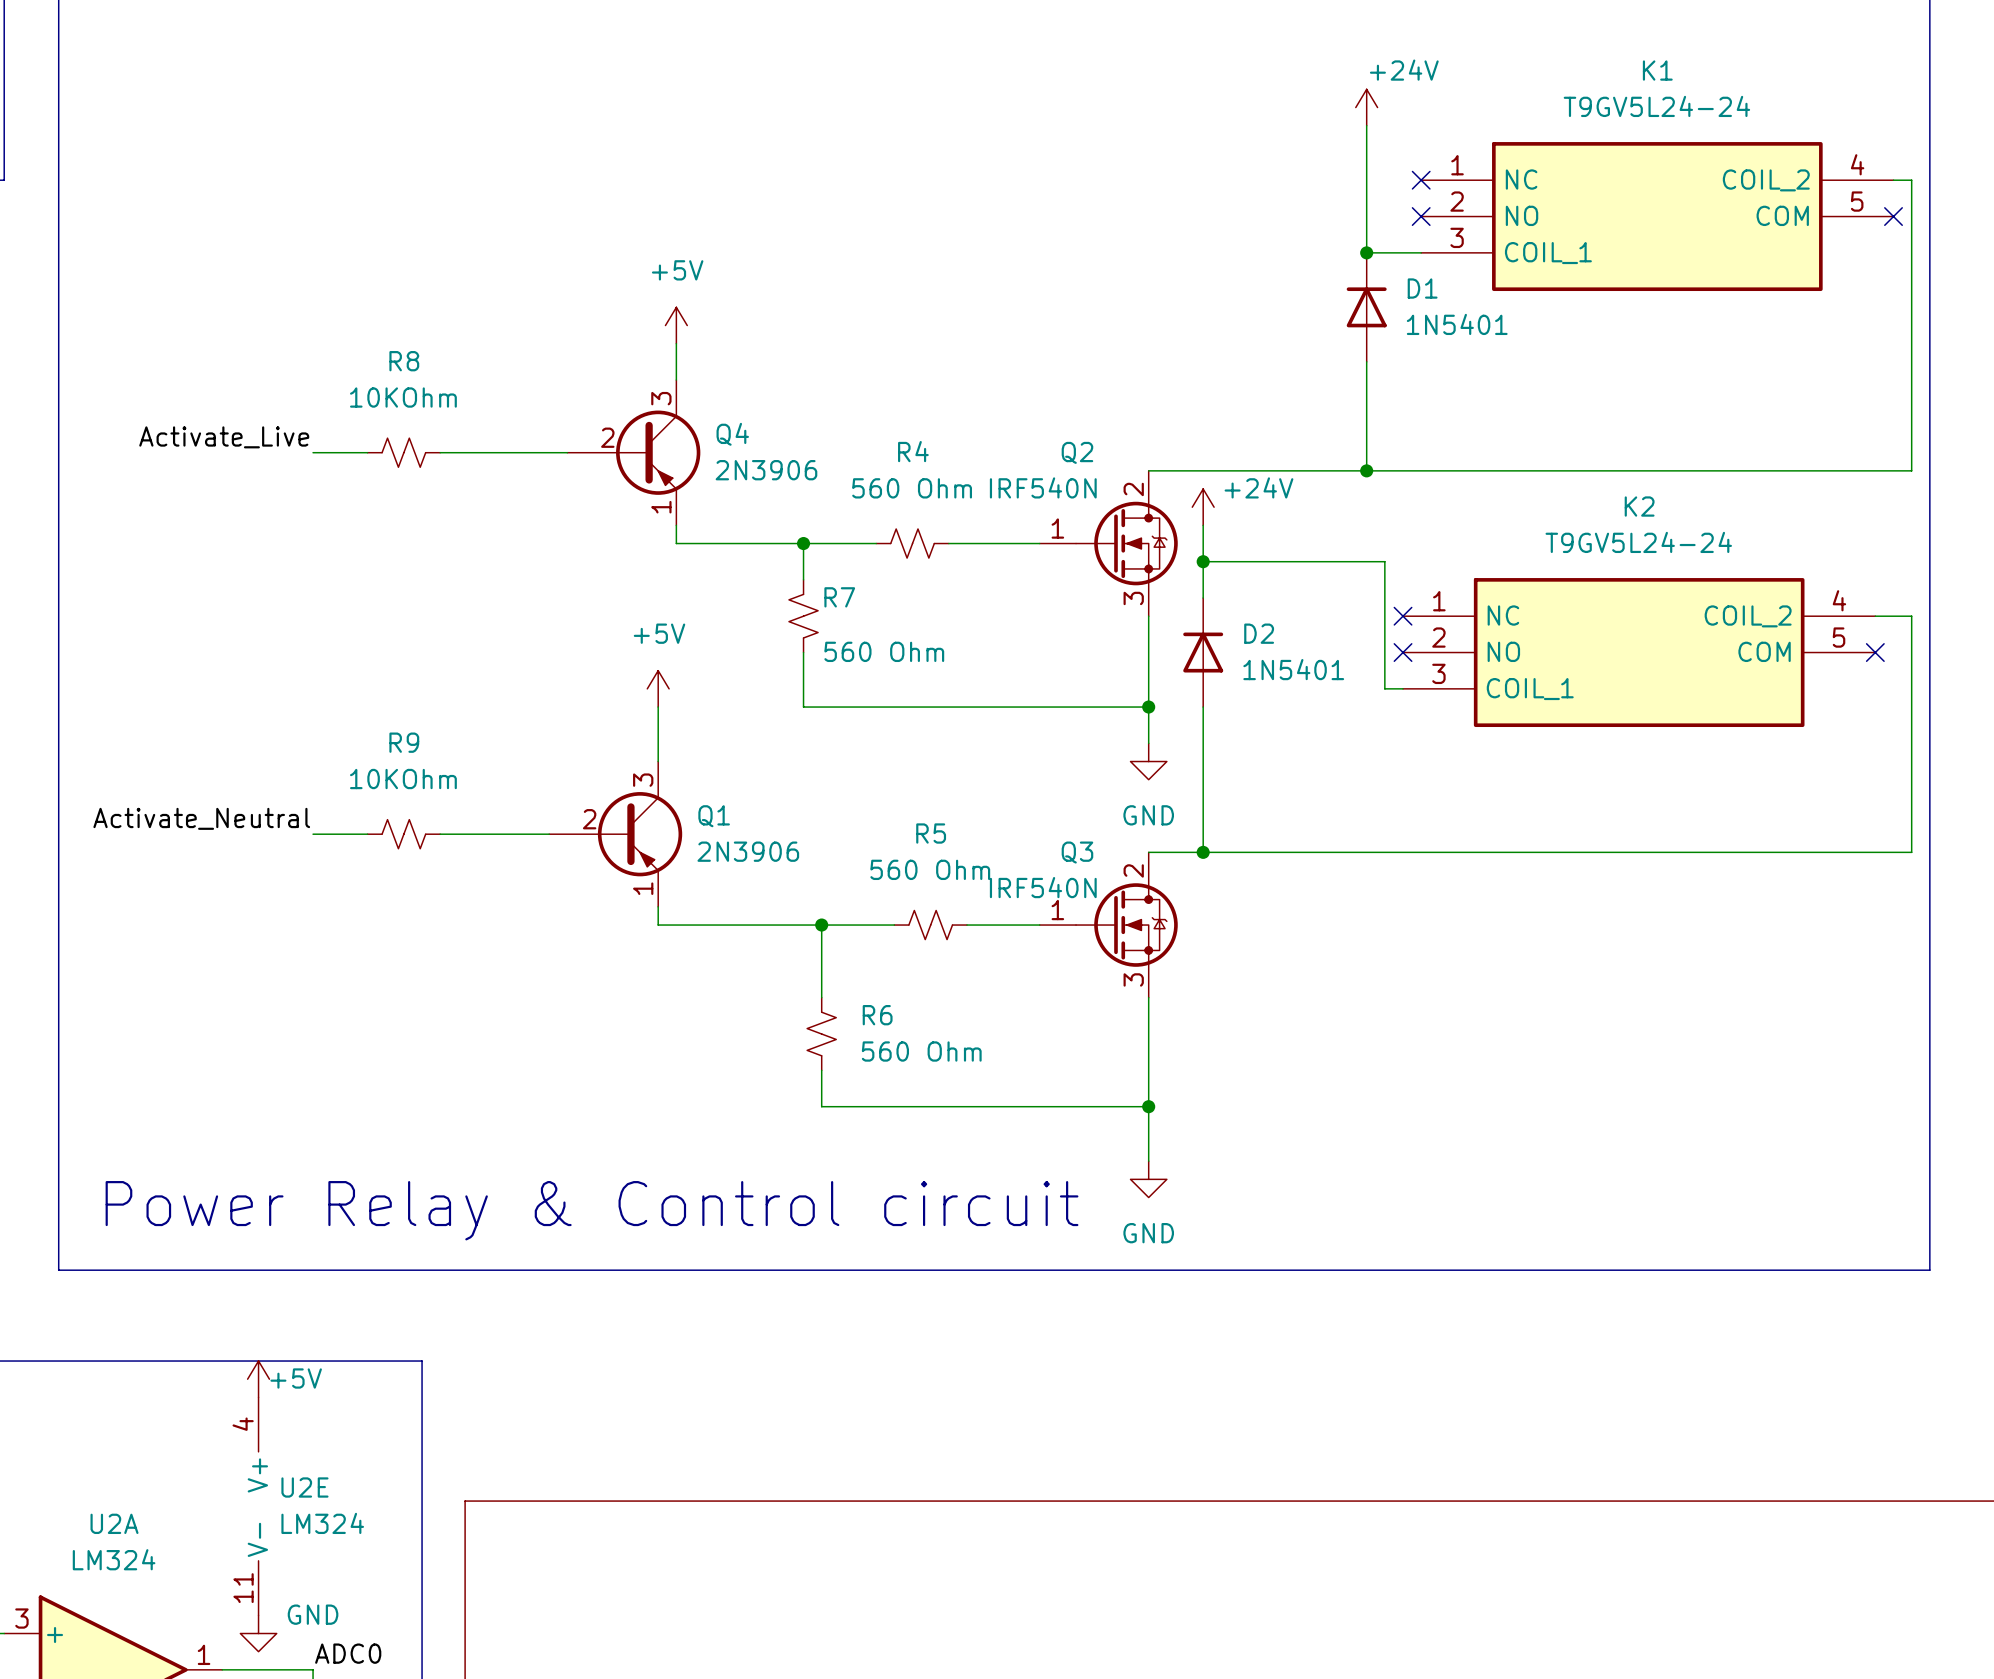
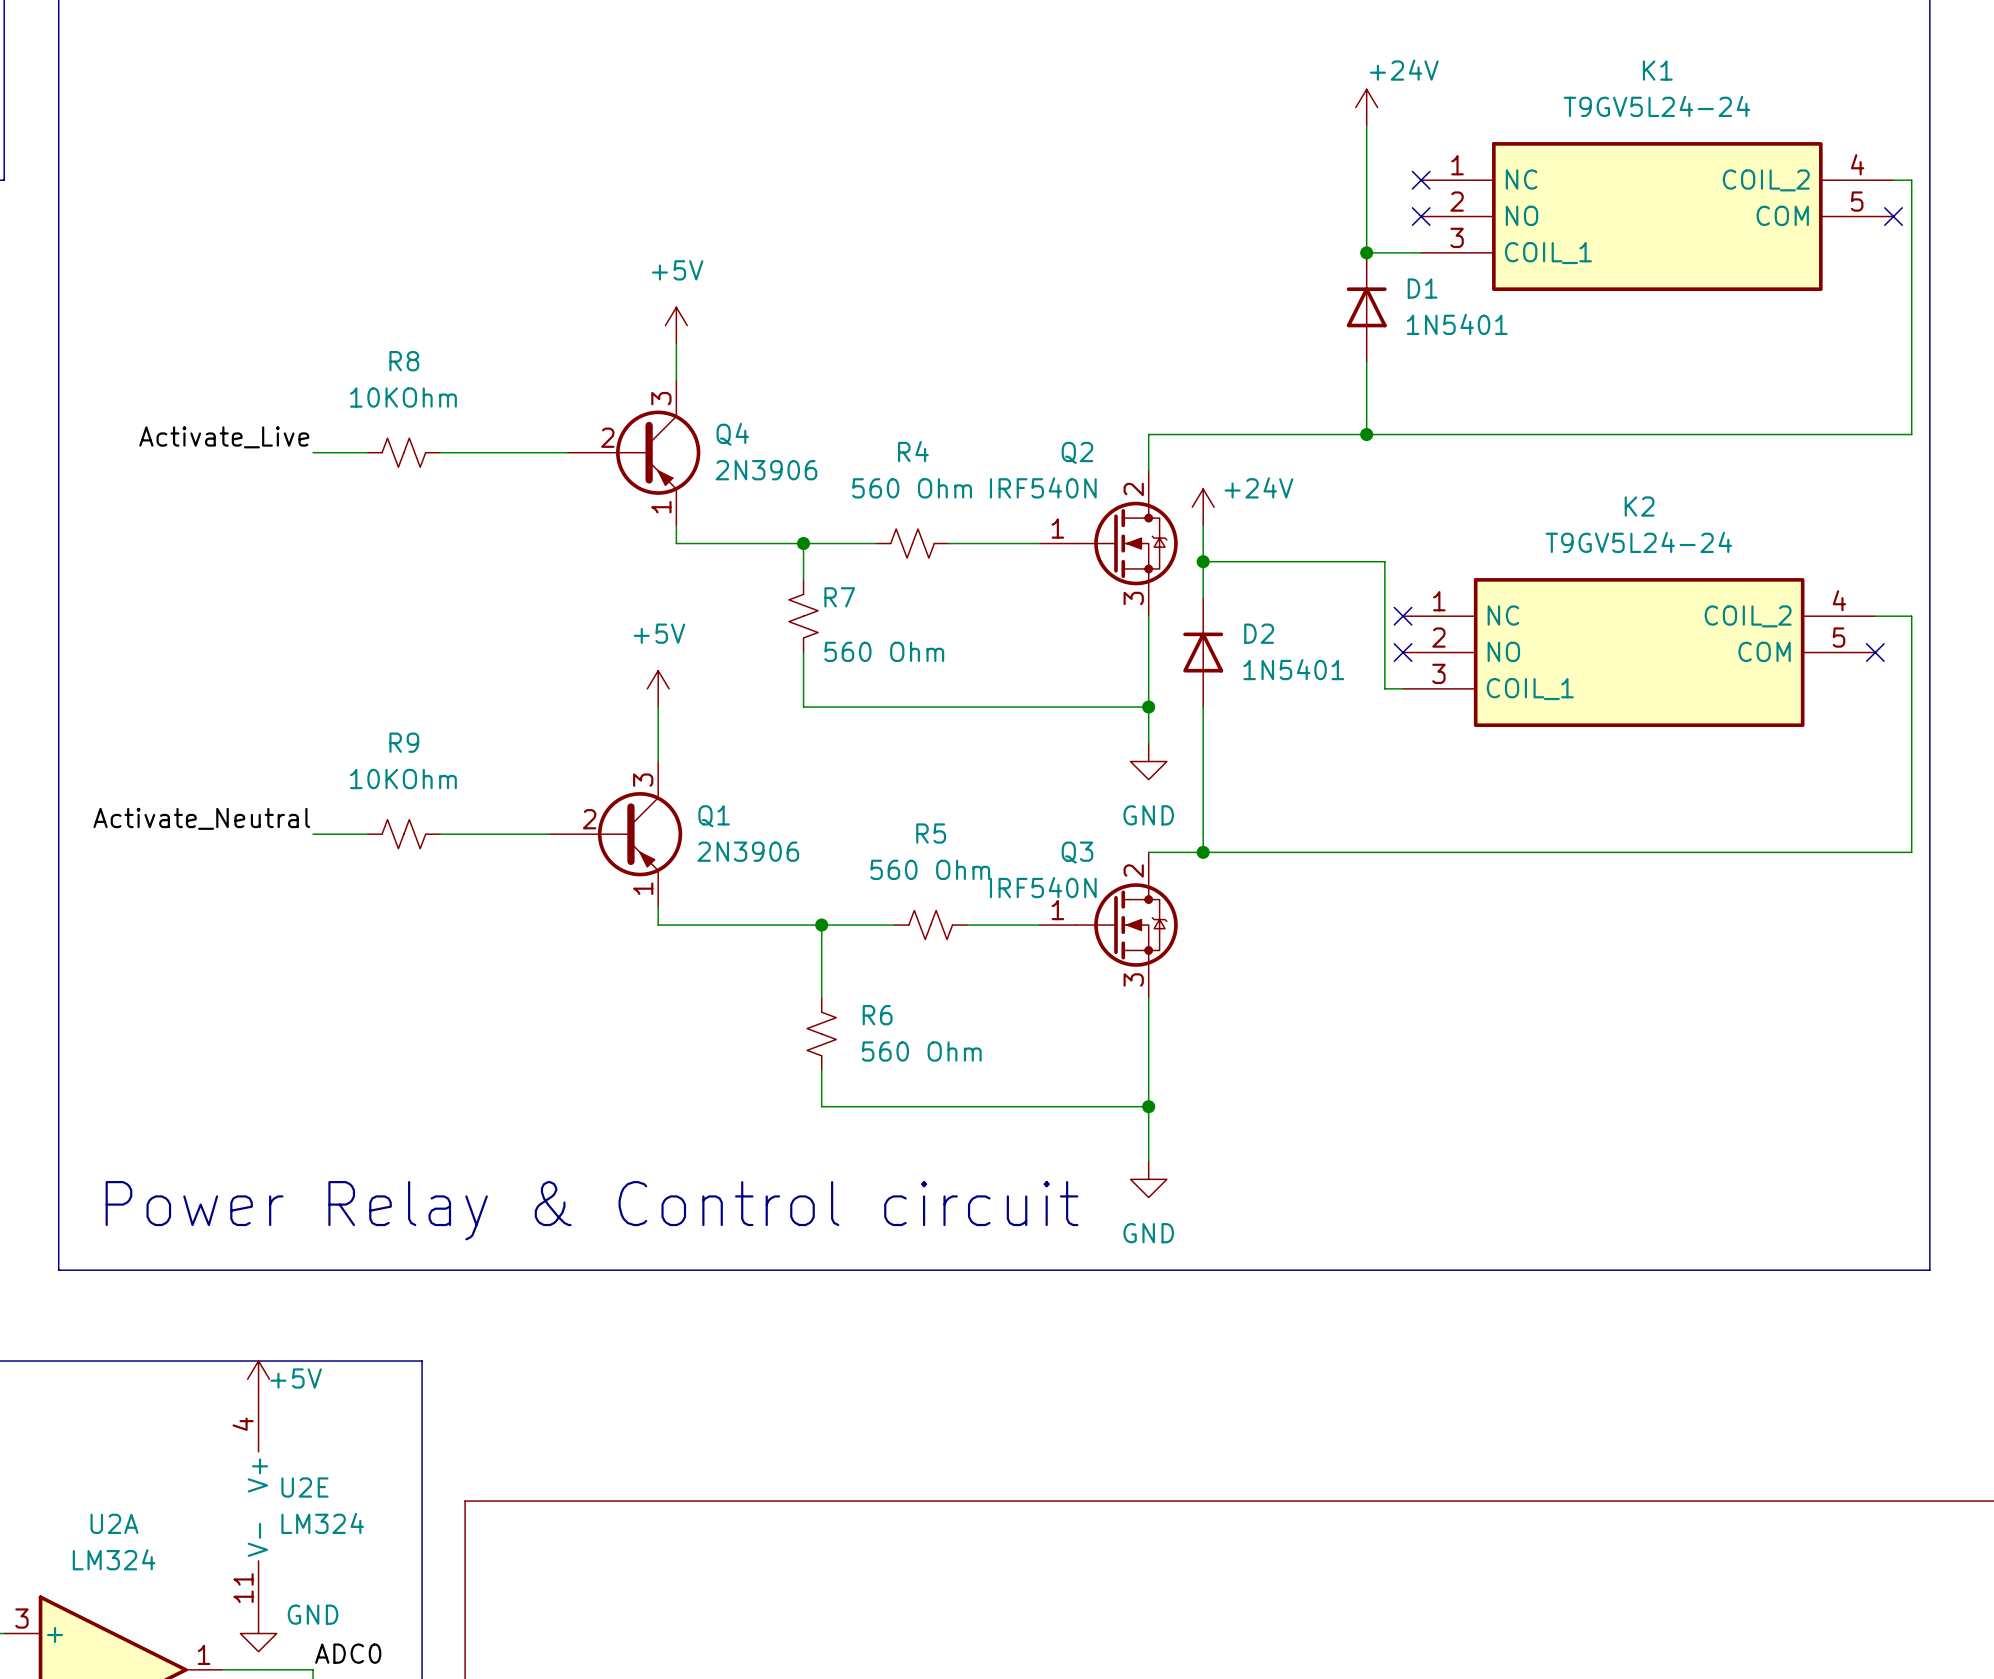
wire: (1366, 434) (1366, 470) -> none
wire: (1911, 434) (1911, 470) (1148, 470) -> (1911, 434) (1148, 434) (1148, 470)
junction position: (1366, 470) -> (1366, 434)

